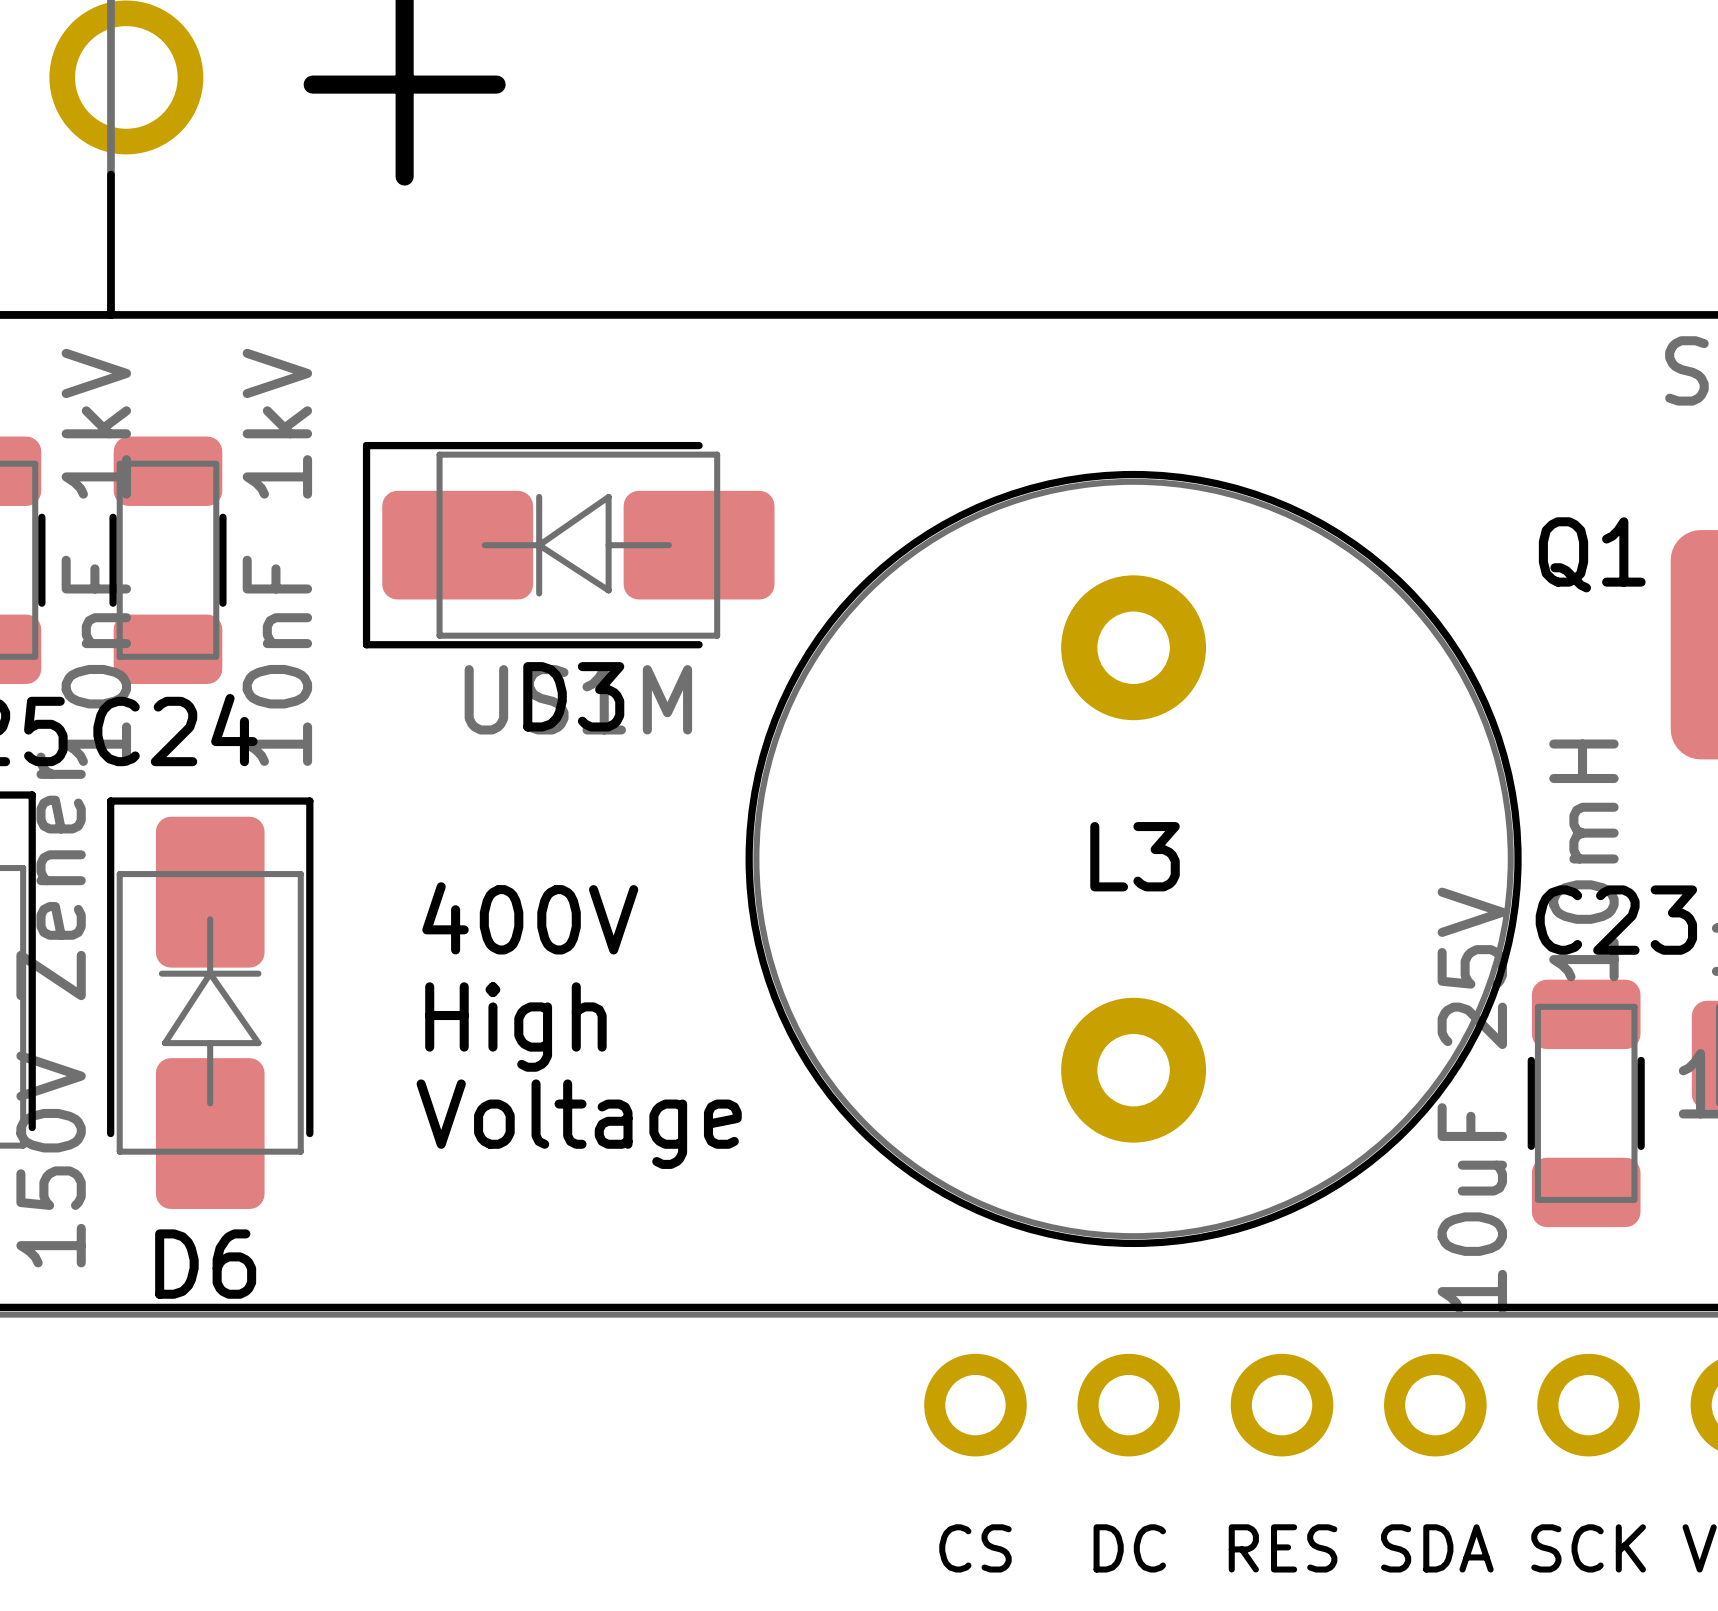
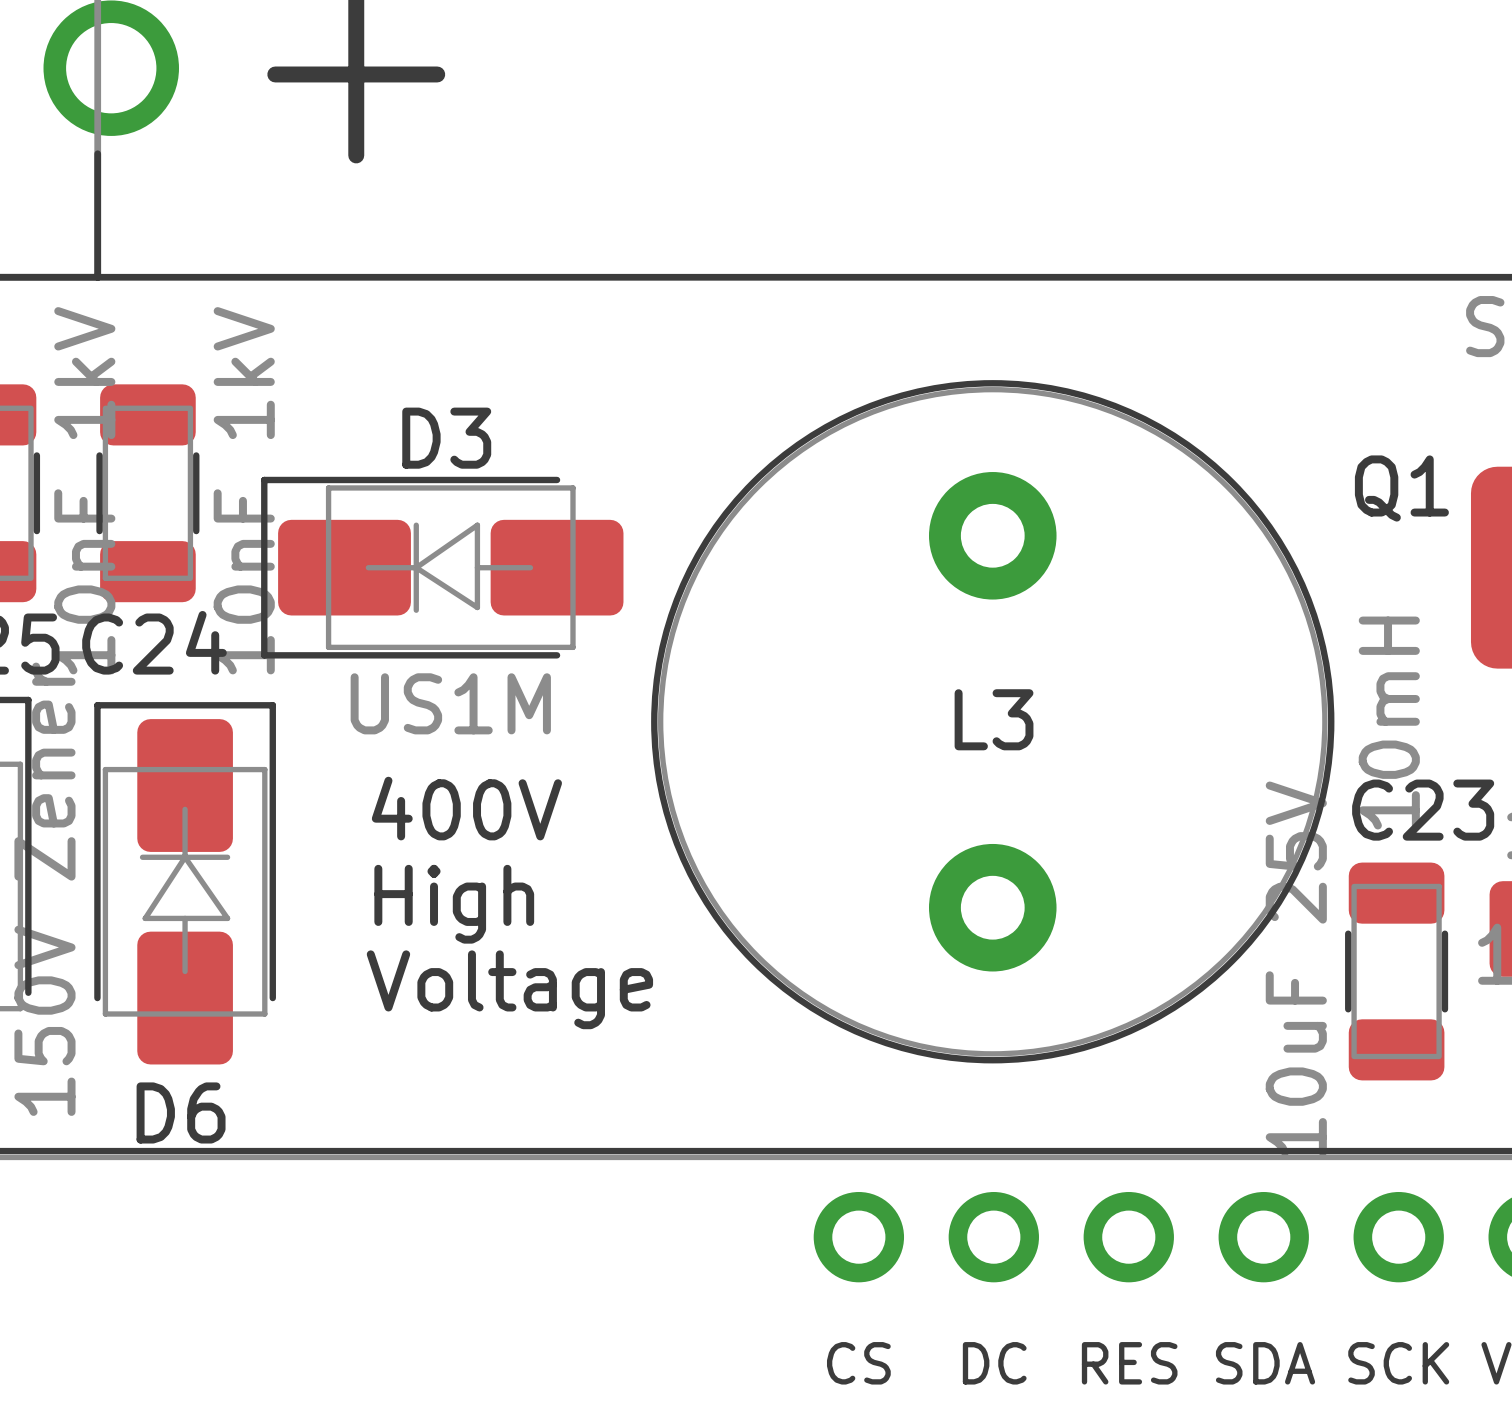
D3 position: (568, 545) -> (442, 567)
D3 name position: D3 (573, 696) -> D3 (446, 438)
L3 position: (1133, 858) -> (992, 721)

